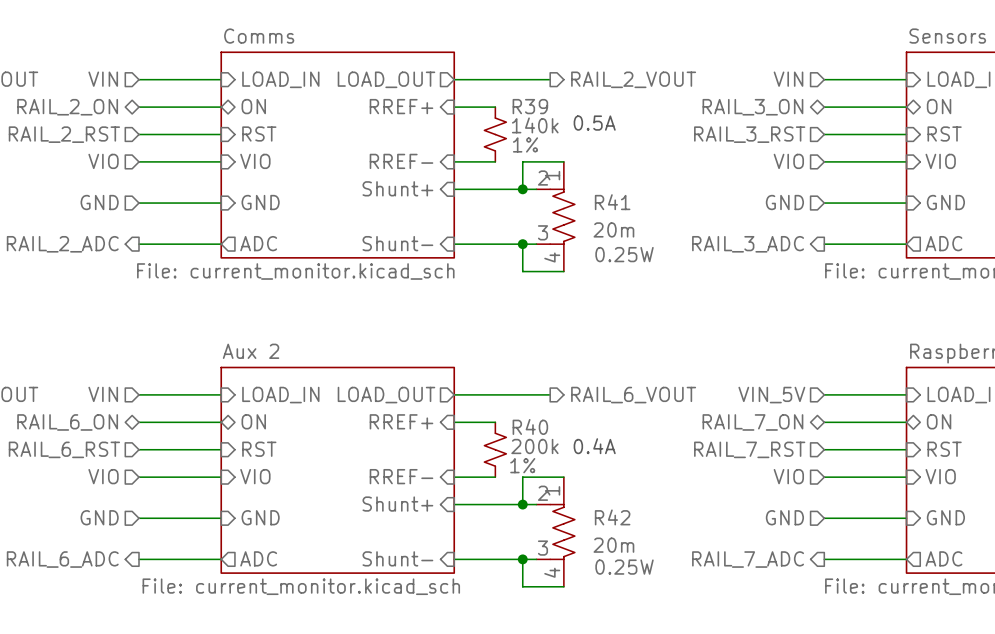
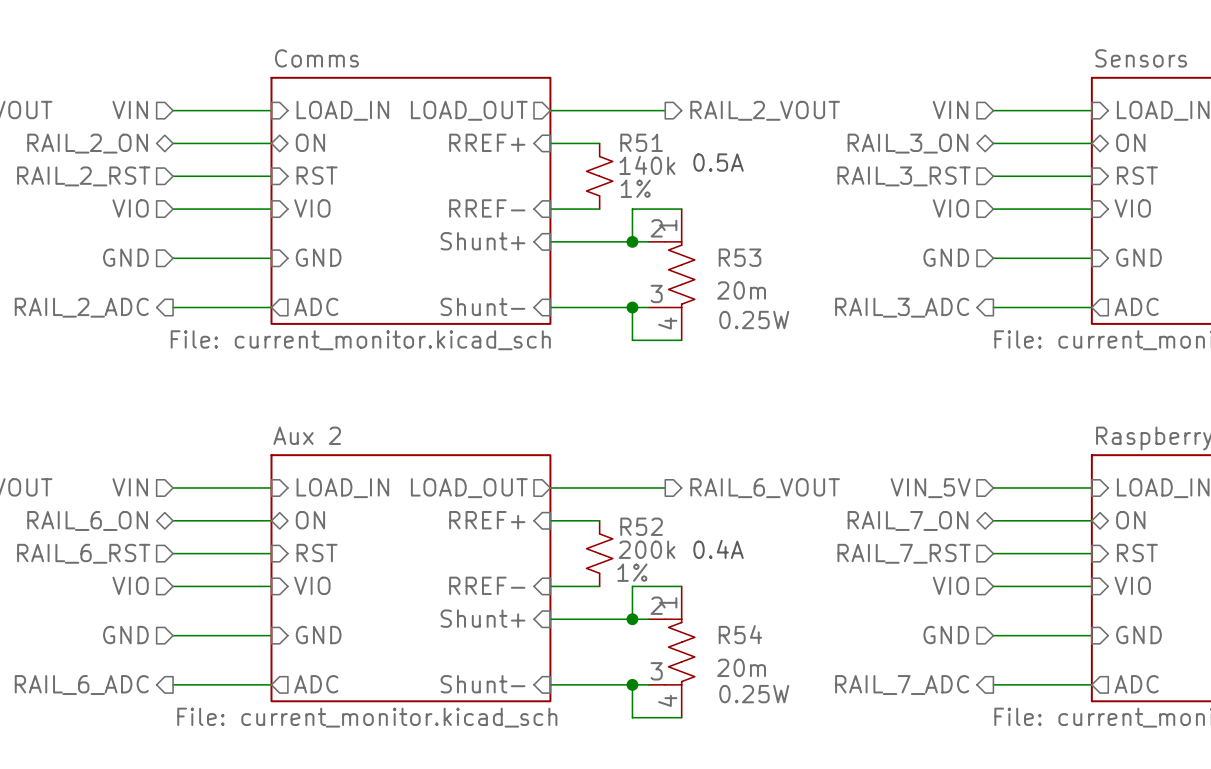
R39 name: R39 (530, 106) -> R51 (641, 142)
R41 name: R41 (612, 202) -> R53 (740, 257)
R40 name: R40 (530, 426) -> R52 (641, 526)
R42 name: R42 (612, 517) -> R54 (740, 634)

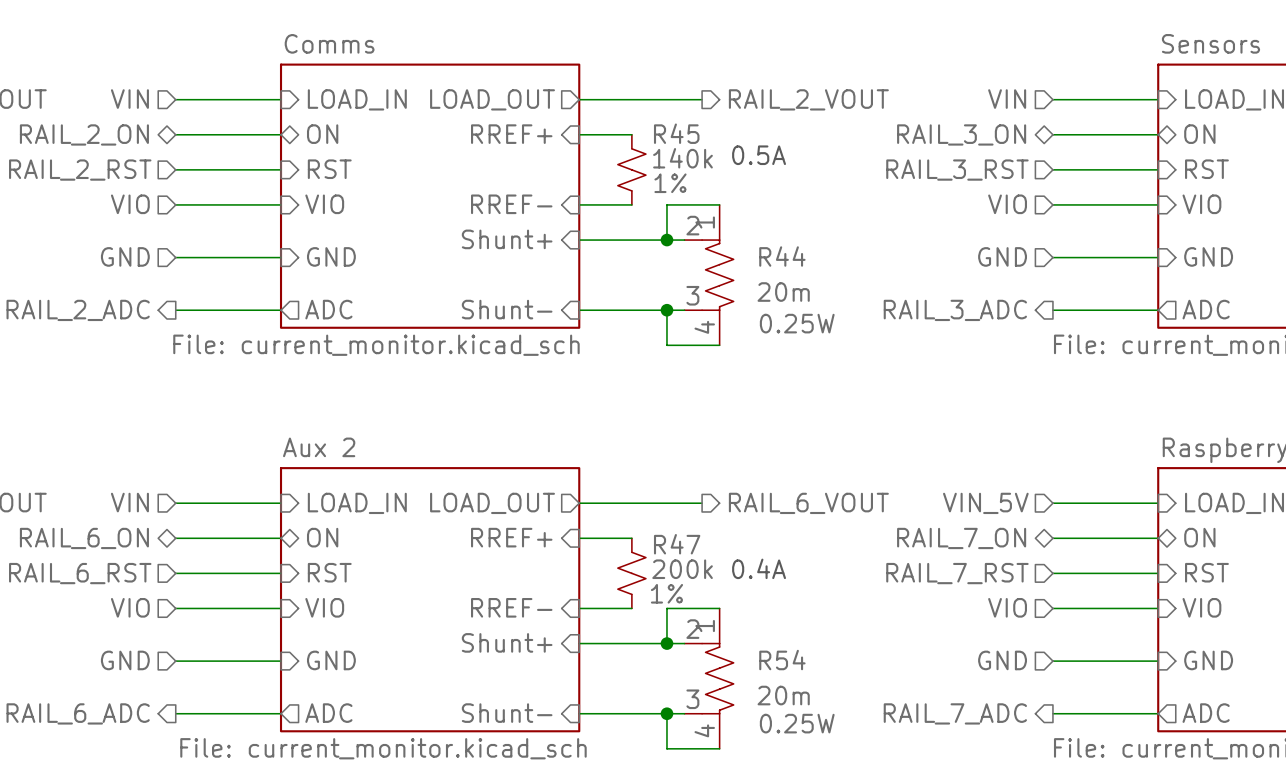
R51 name: R51 (641, 142) -> R45 (676, 133)
R53 name: R53 (740, 257) -> R44 (782, 256)
R52 name: R52 (641, 526) -> R47 (677, 544)

